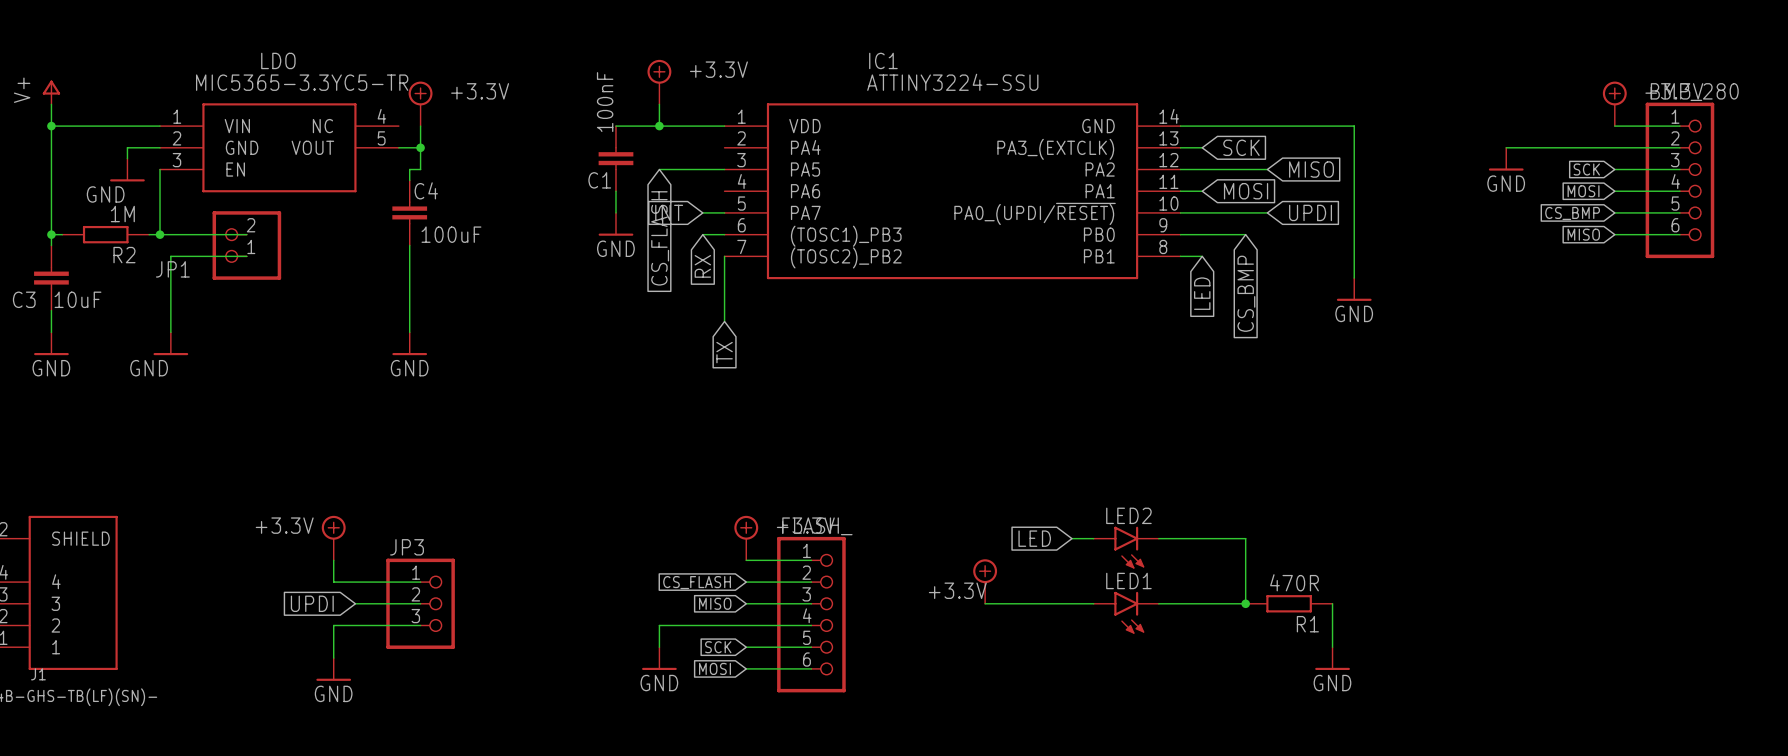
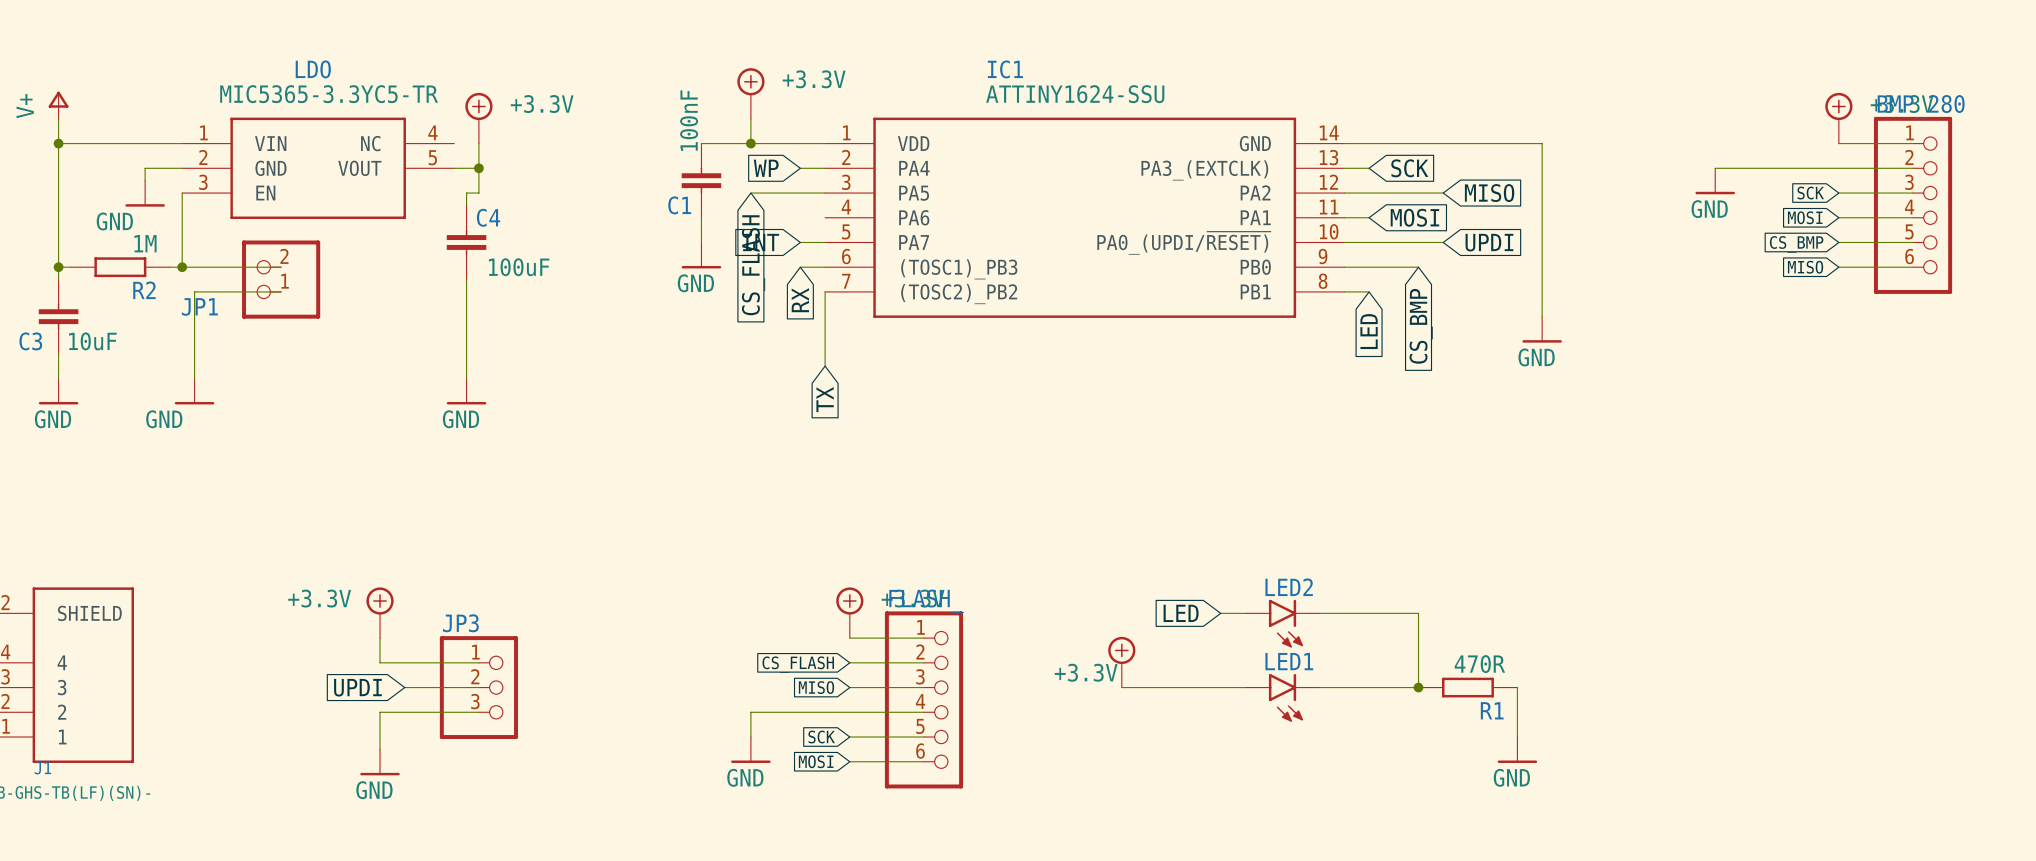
IC1 value: ATTINY3224-SSU (952, 82) -> ATTINY1624-SSU (1075, 94)
global label: none -> WP (766, 168)
wire: none -> (800, 168) (825, 168)

